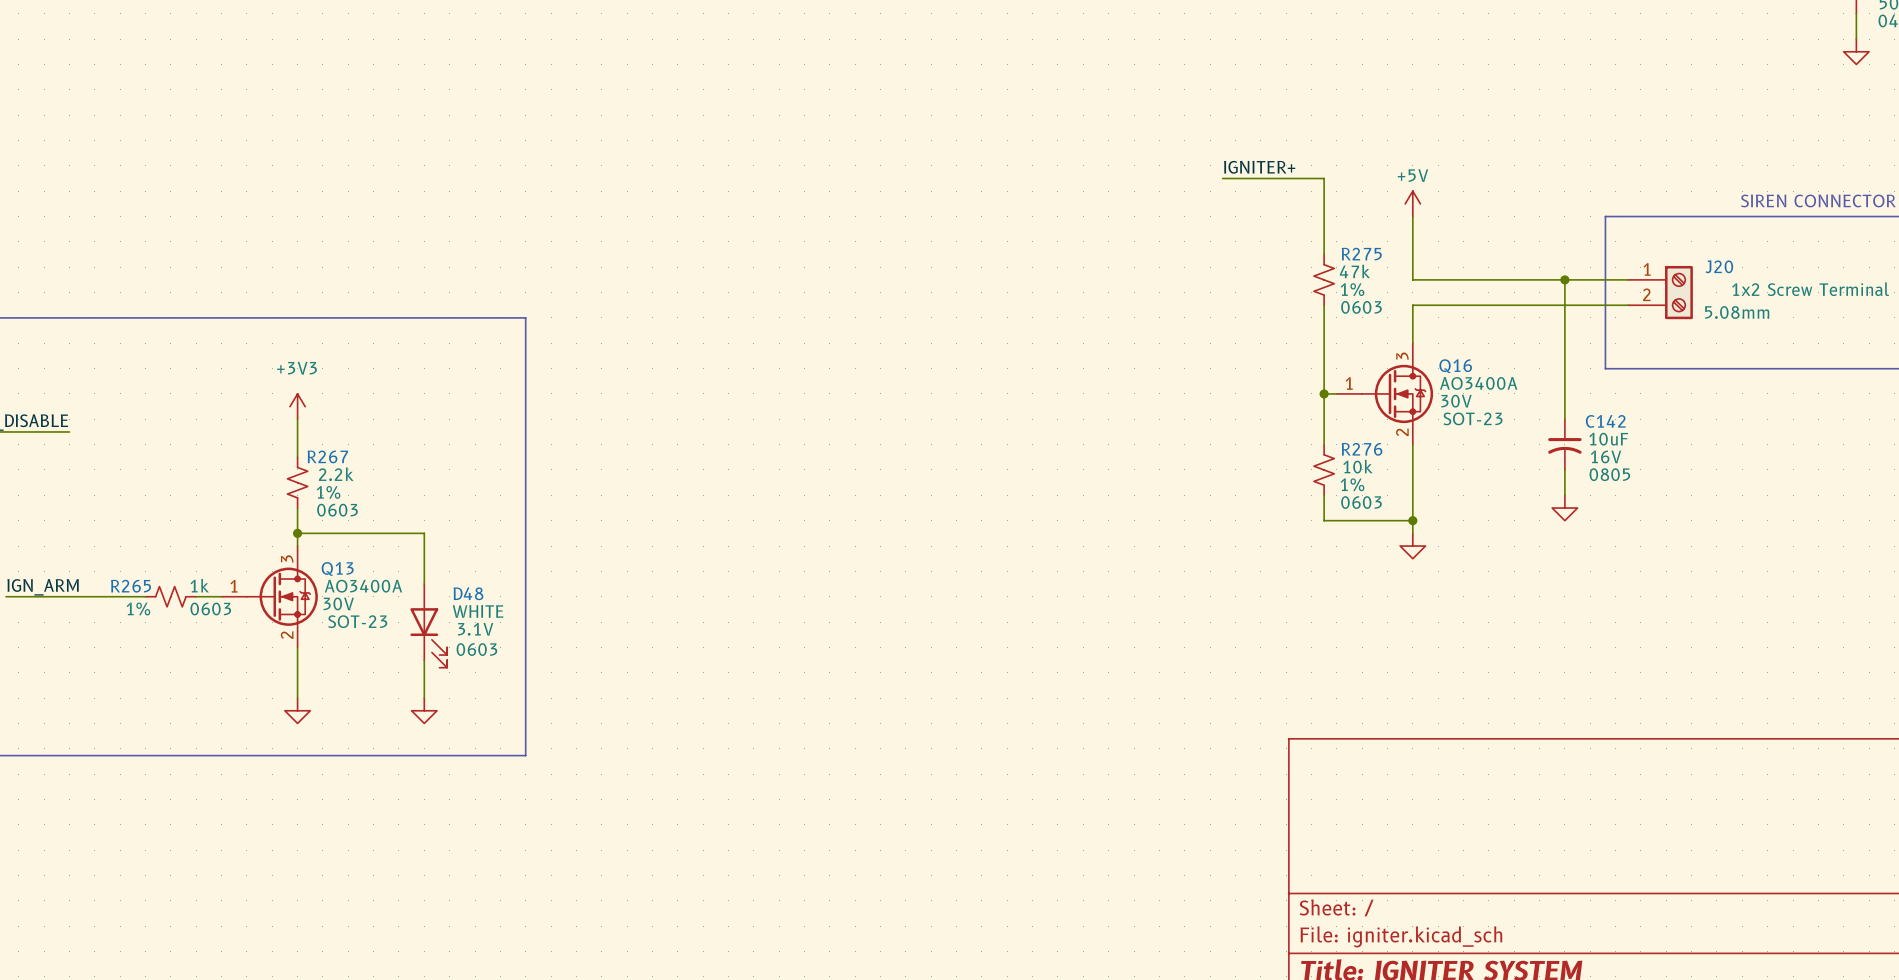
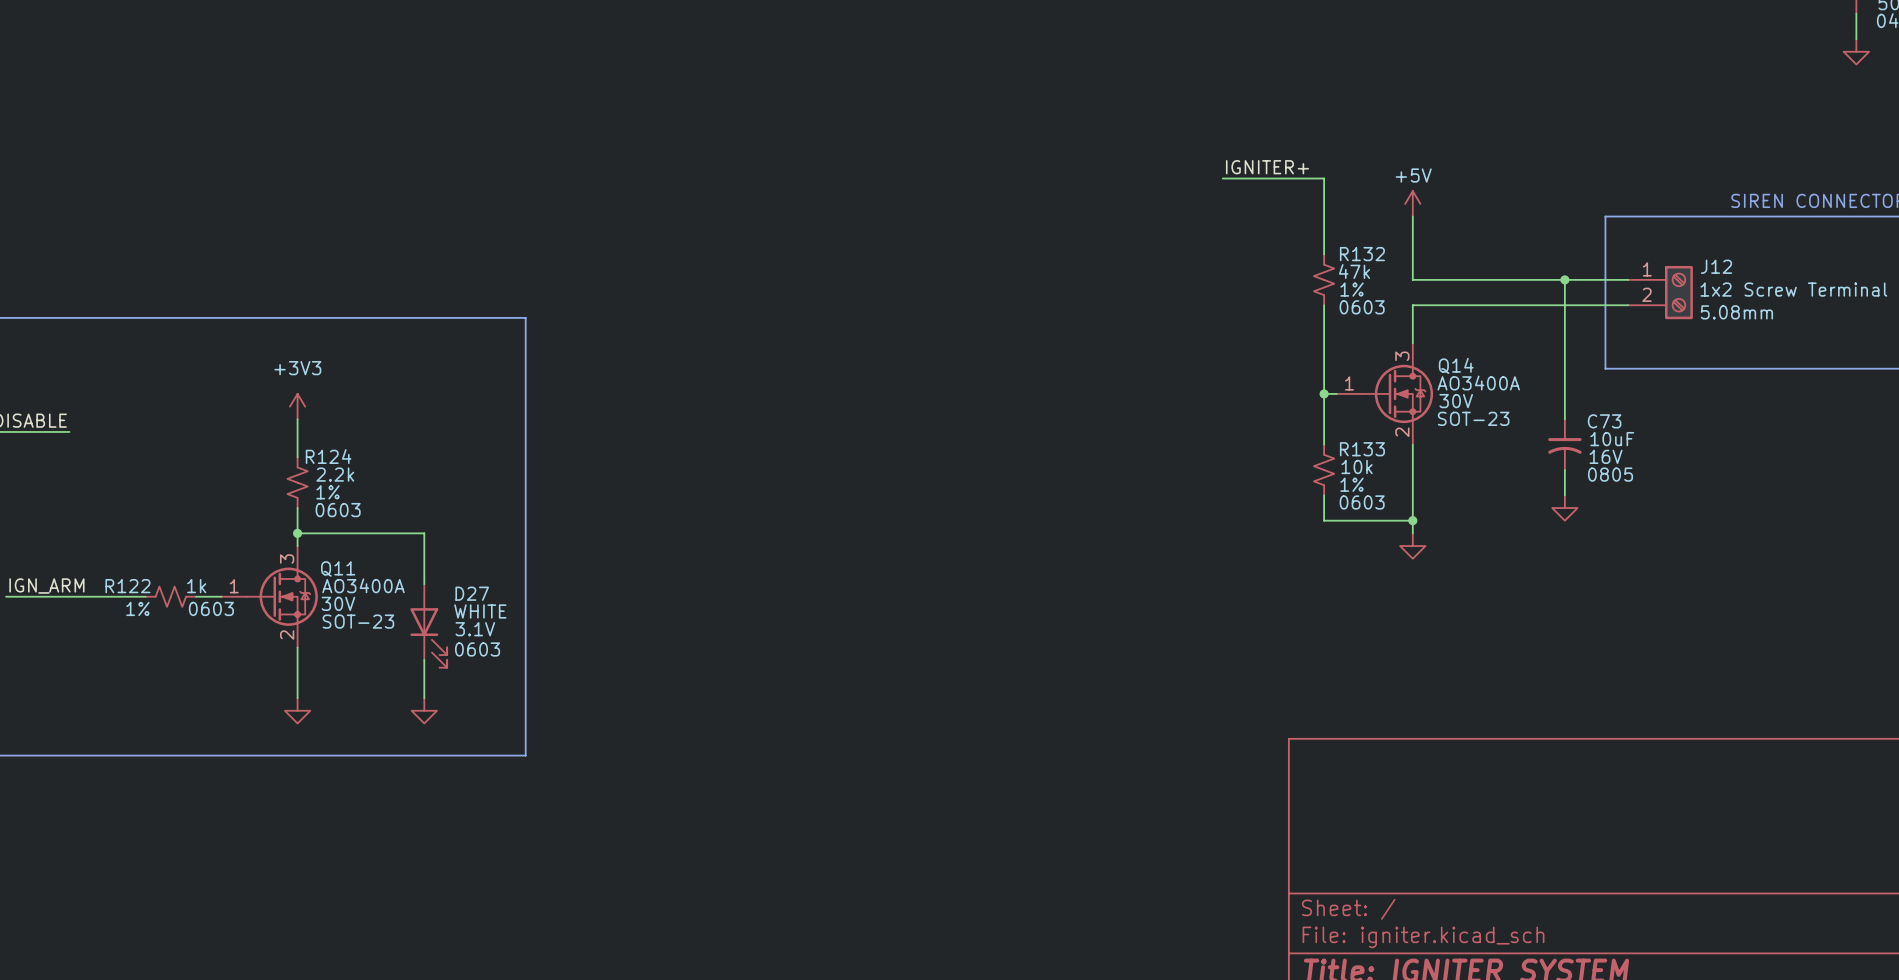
R275 name: R275 (1361, 254) -> R132 (1362, 254)
J20 name: J20 (1719, 266) -> J12 (1716, 266)
Q16 name: Q16 (1455, 366) -> Q14 (1456, 365)
C142 name: C142 (1605, 421) -> C73 (1604, 421)
R276 name: R276 (1362, 449) -> R133 (1362, 449)
R267 name: R267 (327, 456) -> R124 (328, 456)
Q13 name: Q13 (337, 568) -> Q11 (338, 568)
R265 name: R265 (131, 586) -> R122 (127, 586)
D48 name: D48 (468, 593) -> D27 (472, 593)

